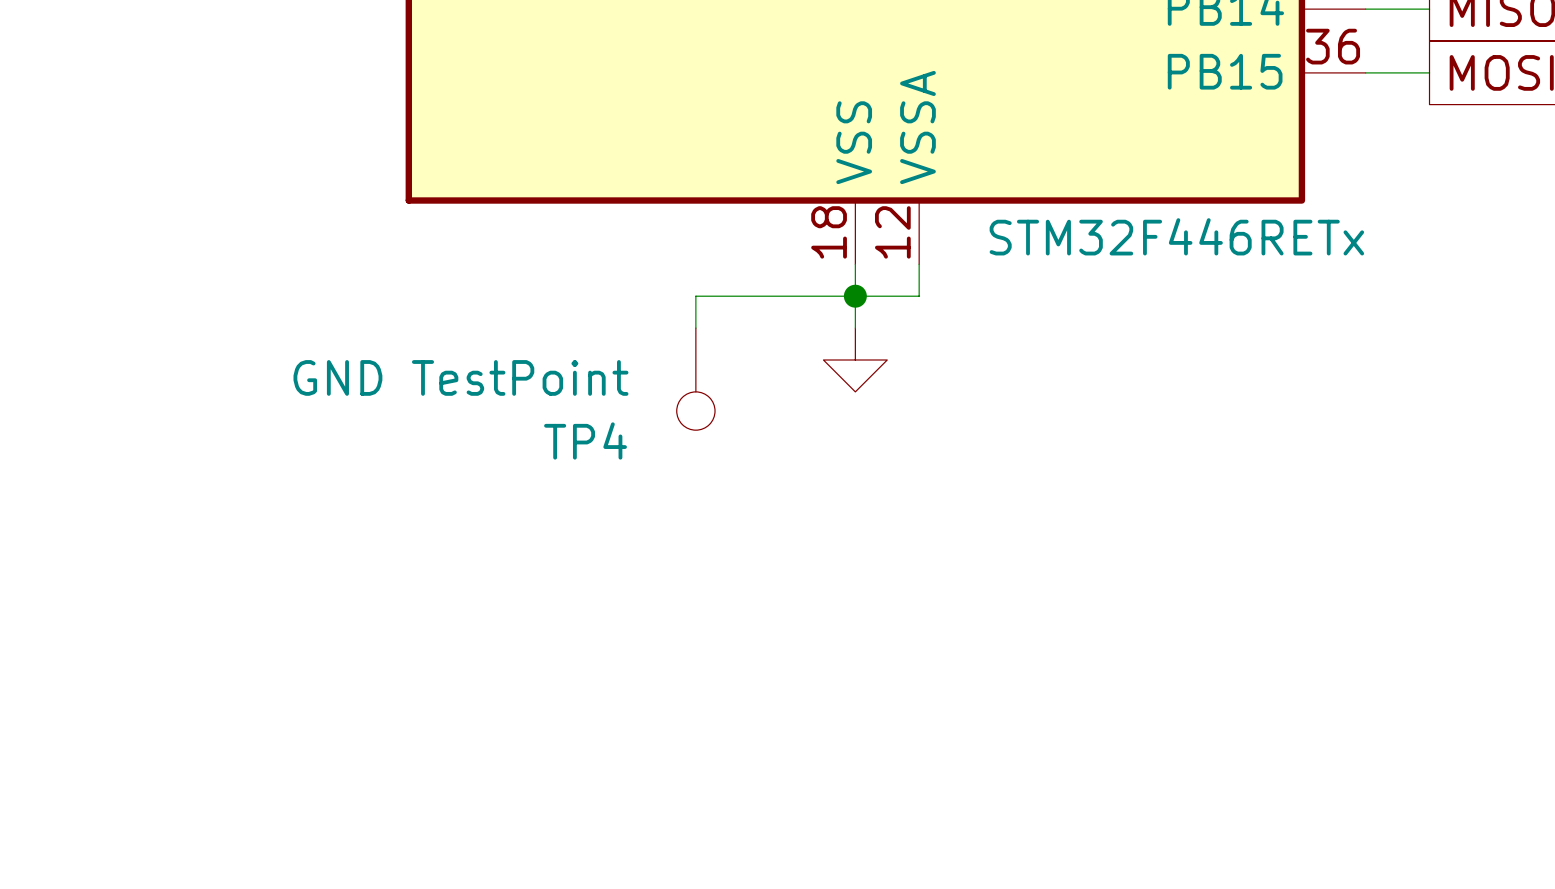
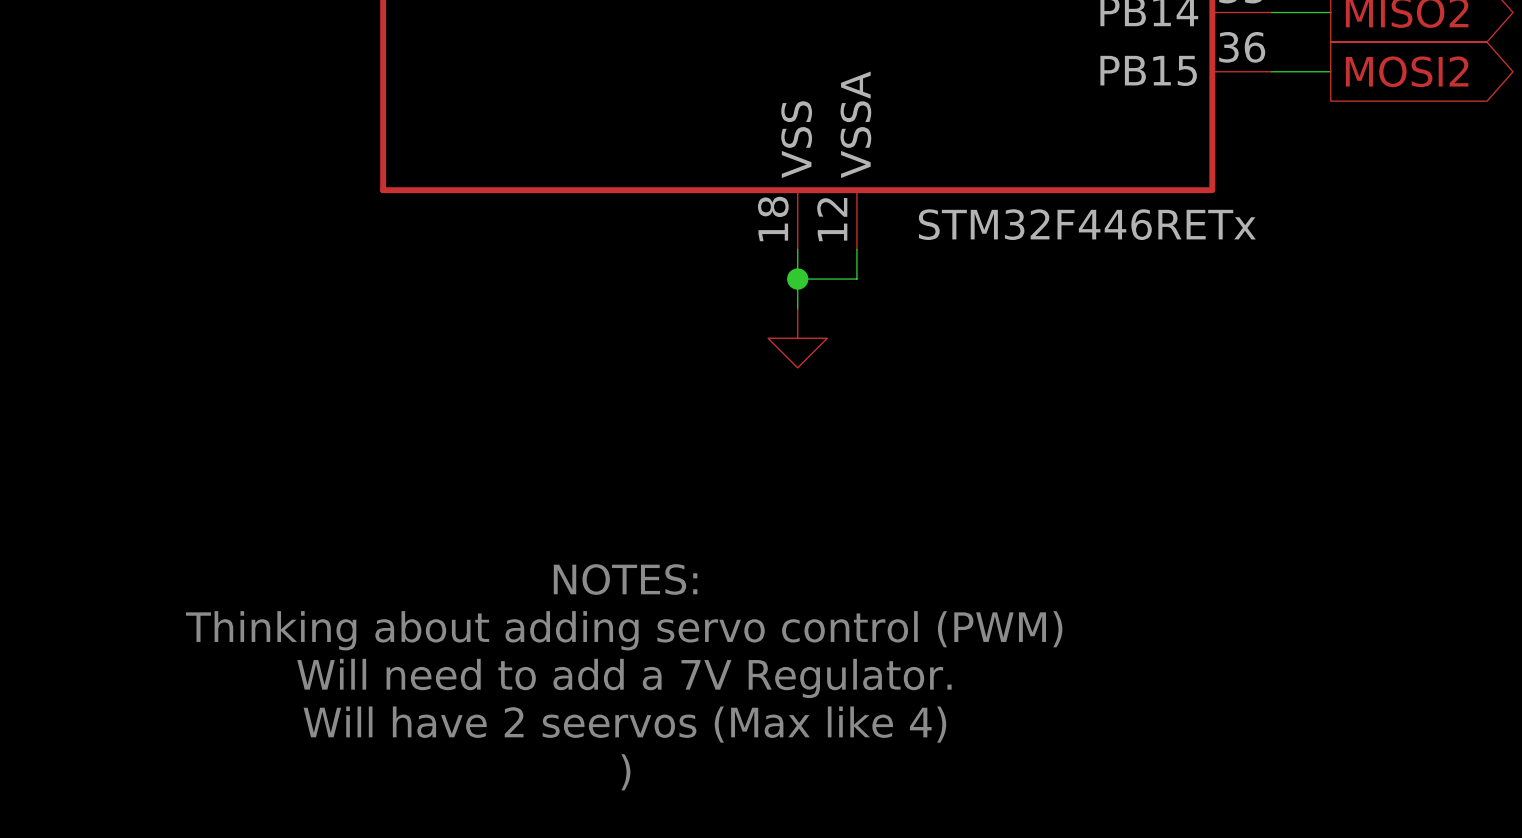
wire: (855, 296) (695, 296) (695, 328) -> none
TP4: GND TestPoint (695, 379) -> none
text: none -> NOTES: (625, 579)
text: none -> Thinking about adding servo control (PWM) (624, 630)
text: none -> Will need to add a 7V Regulator. (624, 678)
text: none -> Will have 2 seervos (Max like 4) (624, 724)
text: none -> ) (625, 772)

